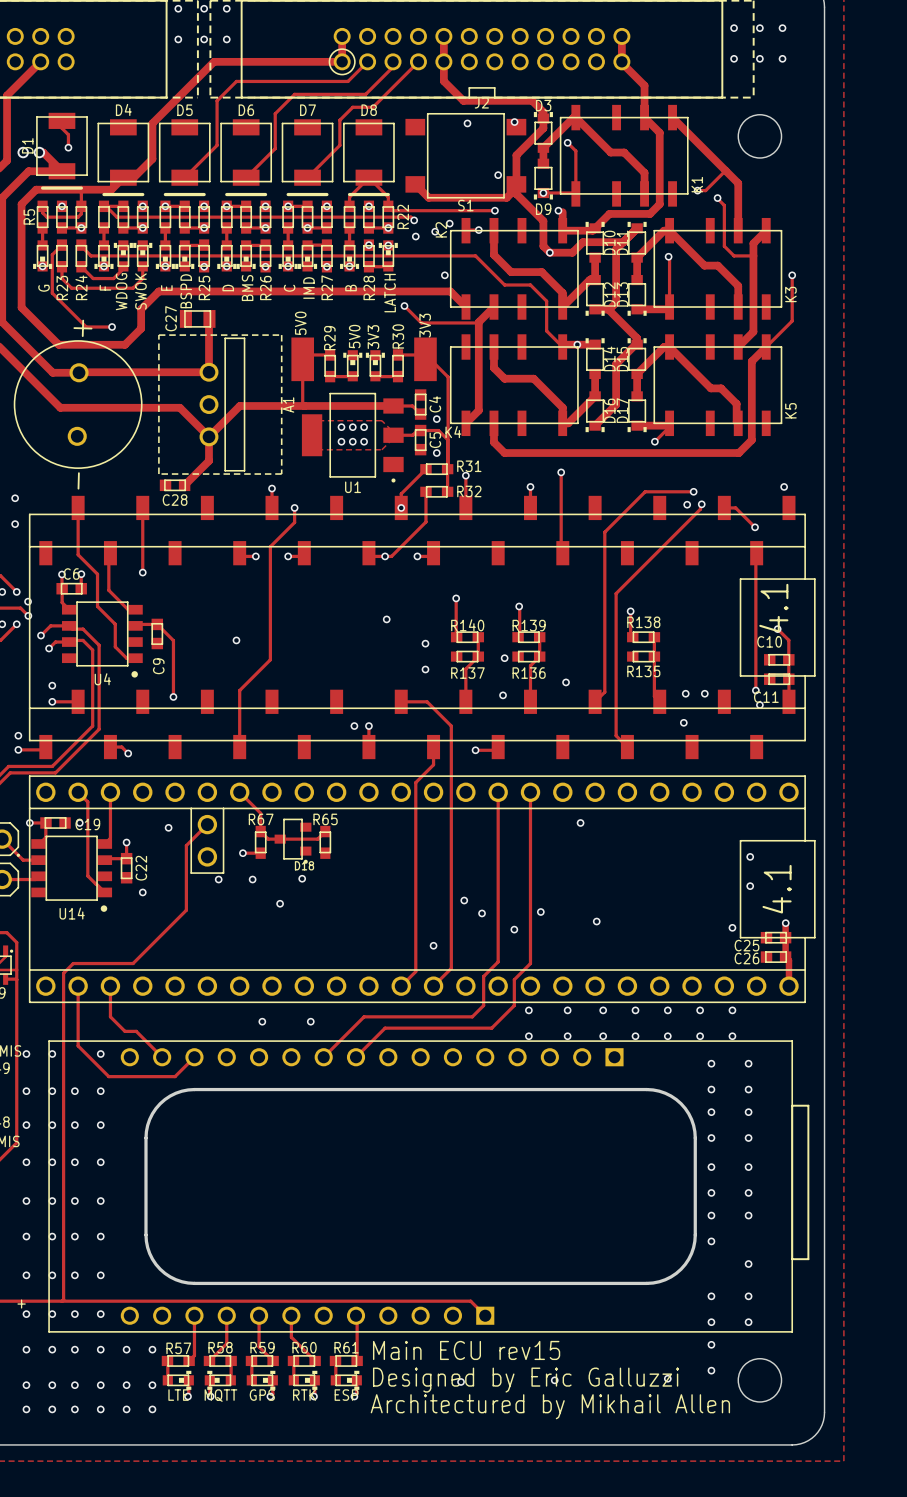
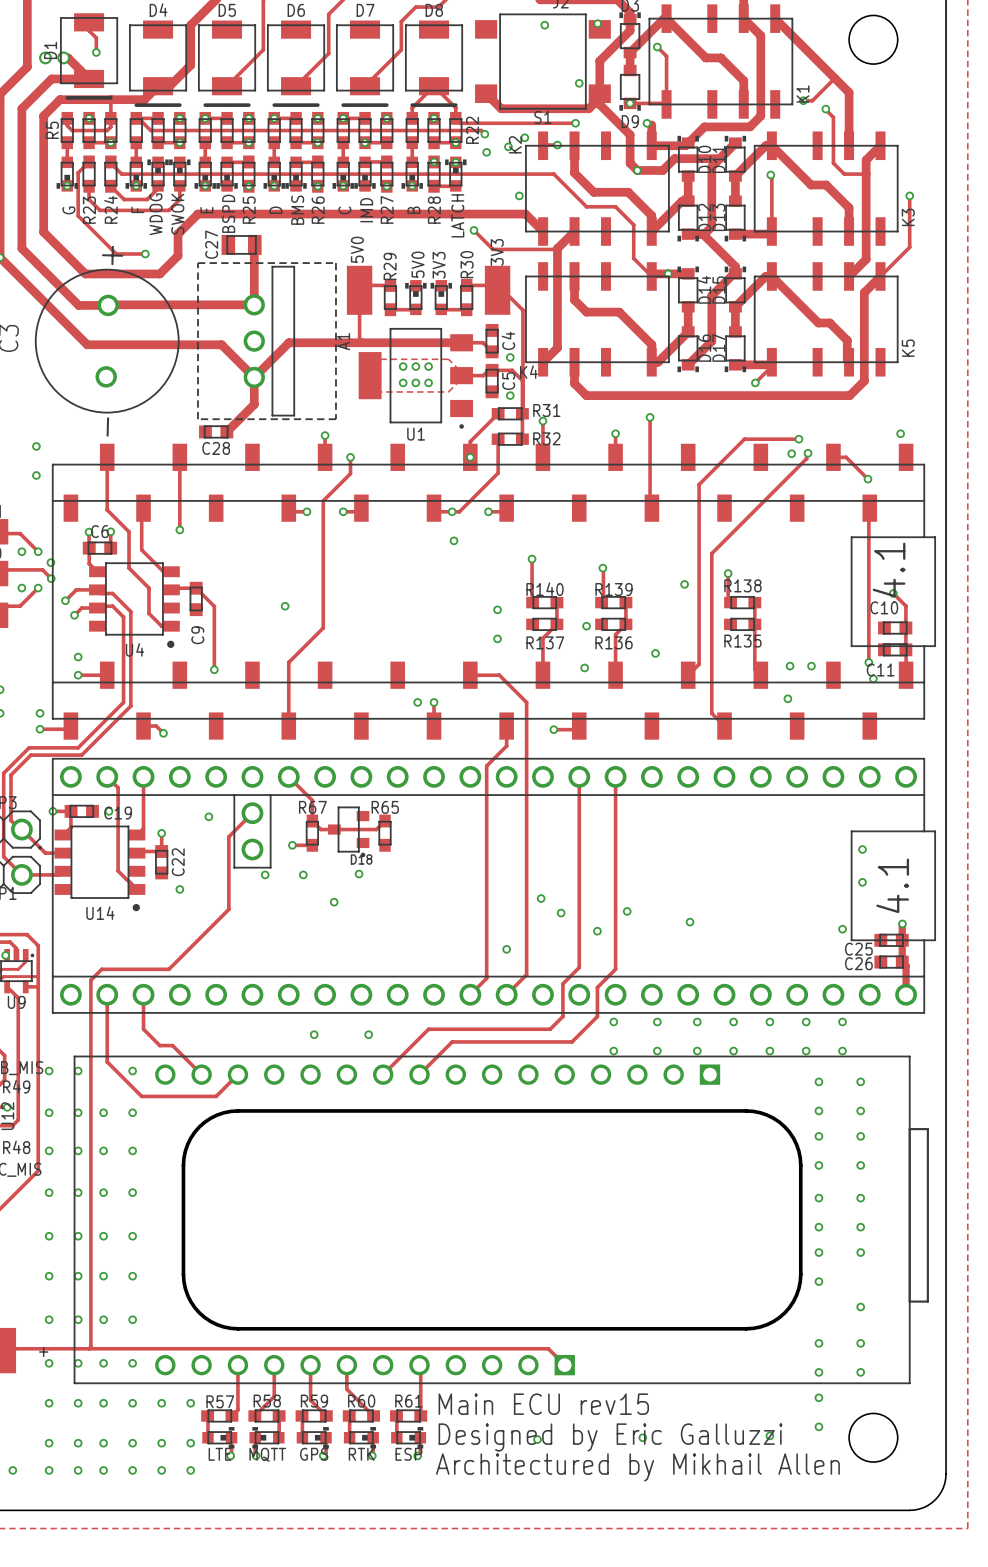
via position: (386, 619) -> (453, 540)
via: none -> (684, 584)
via: (580, 822) -> none

